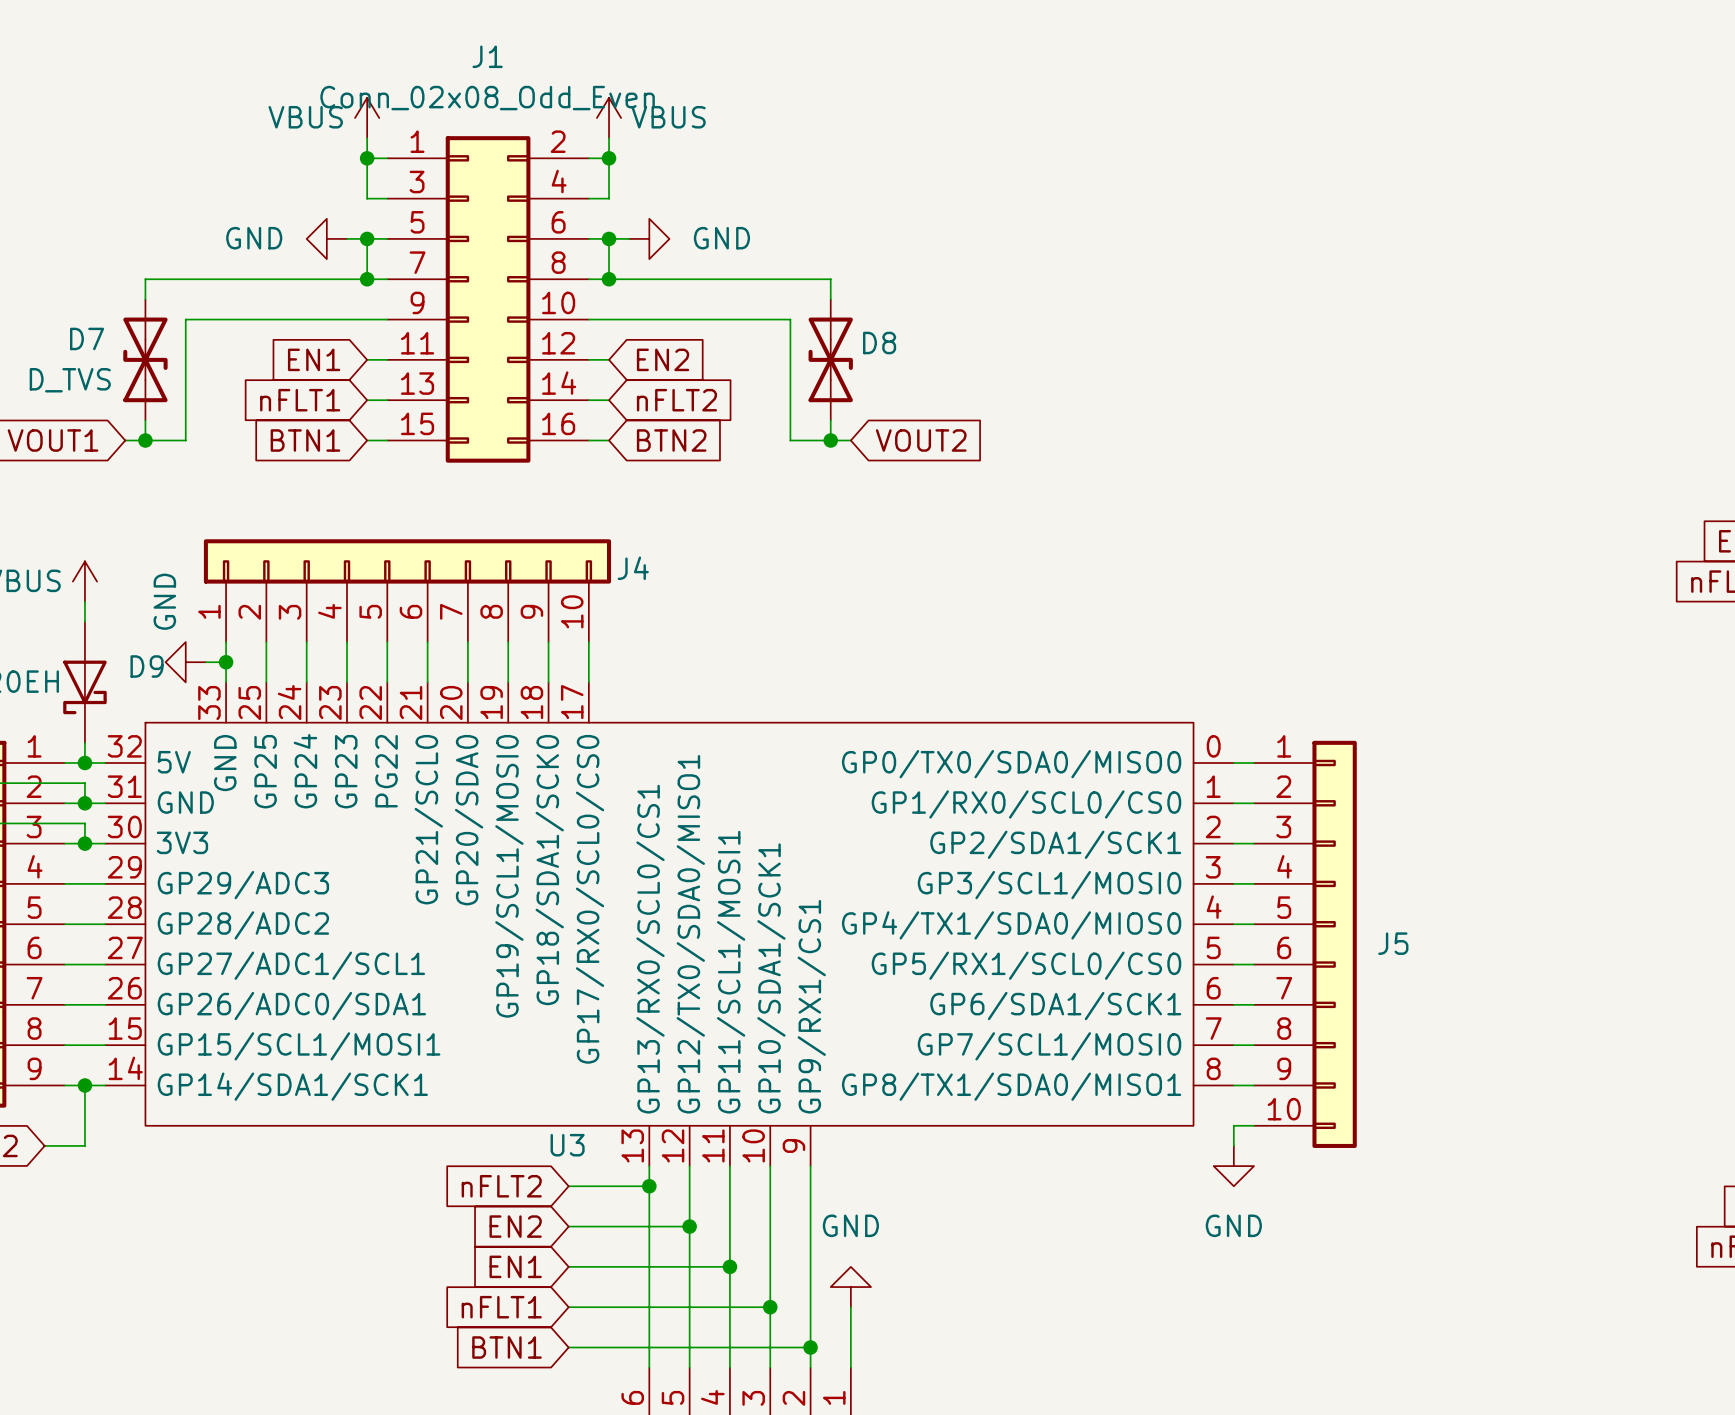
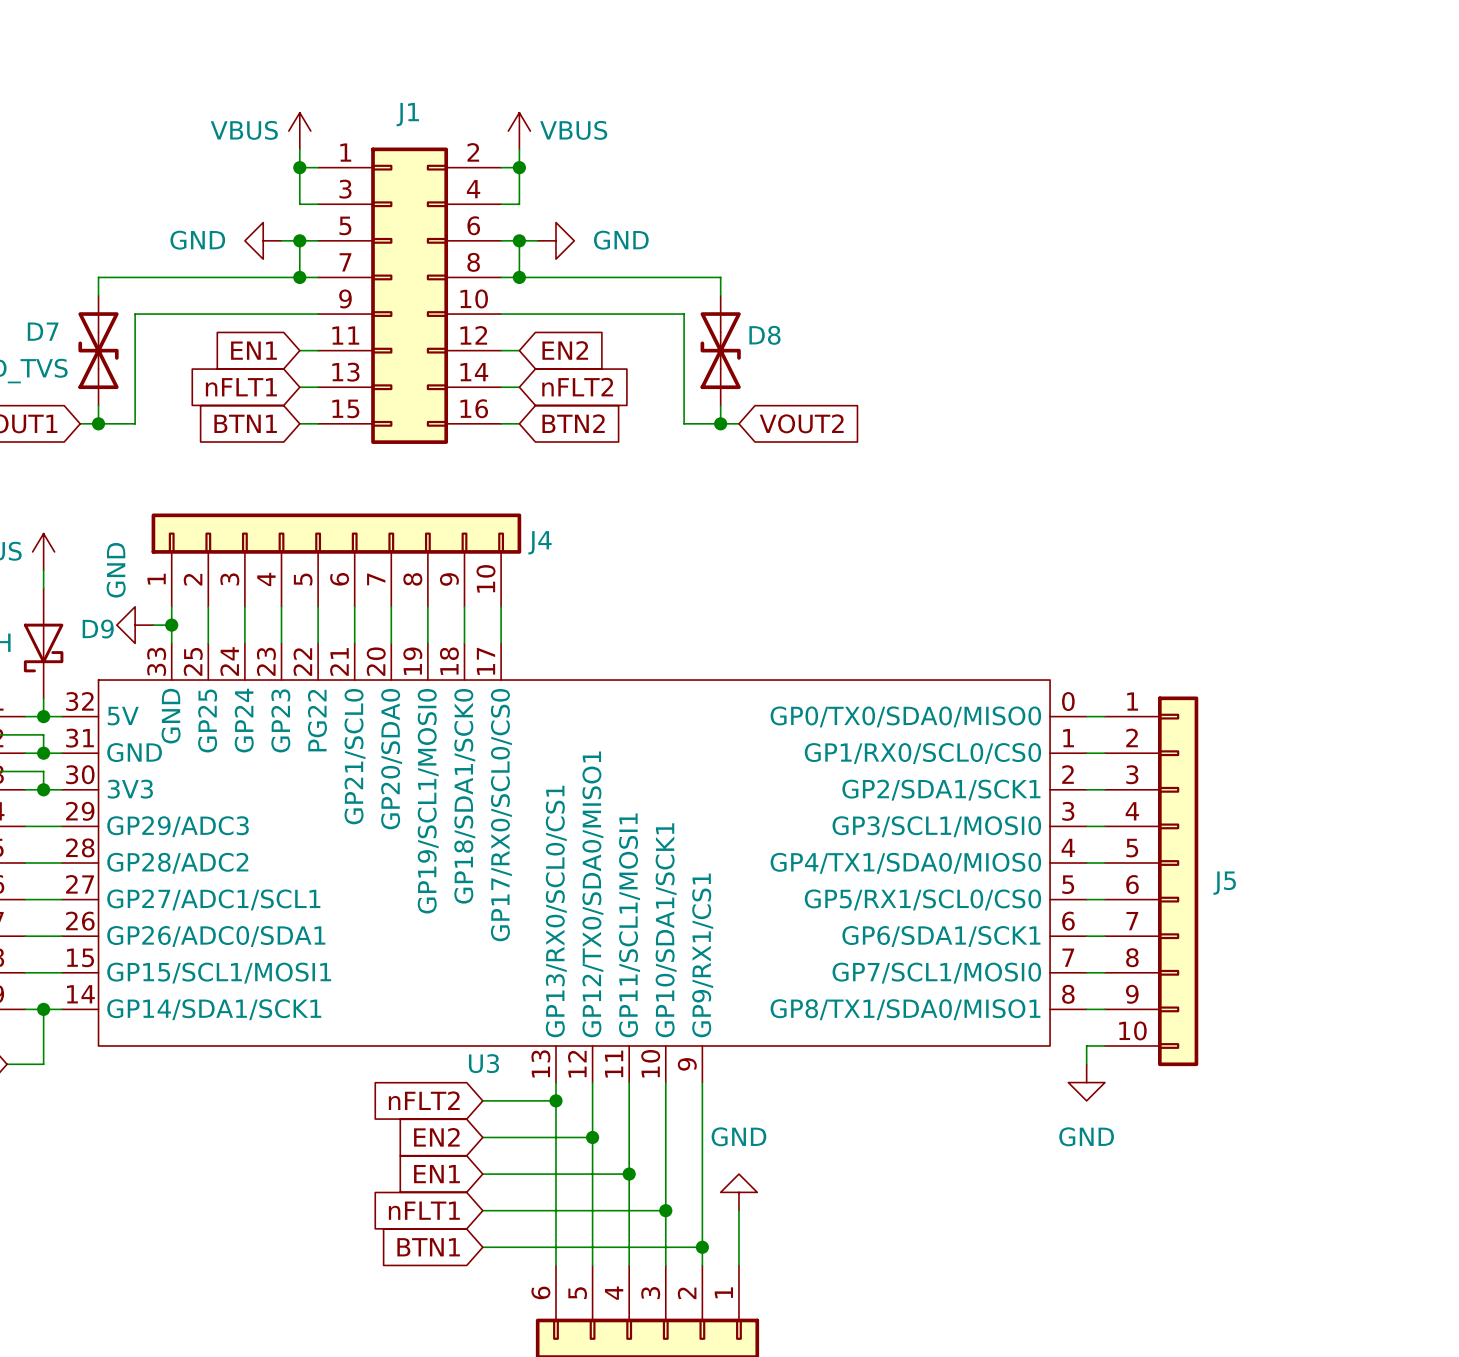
J1 name position: J1 (487, 56) -> J1 (407, 114)
J1 value: Conn_02x08_Odd_Even (487, 98) -> none

